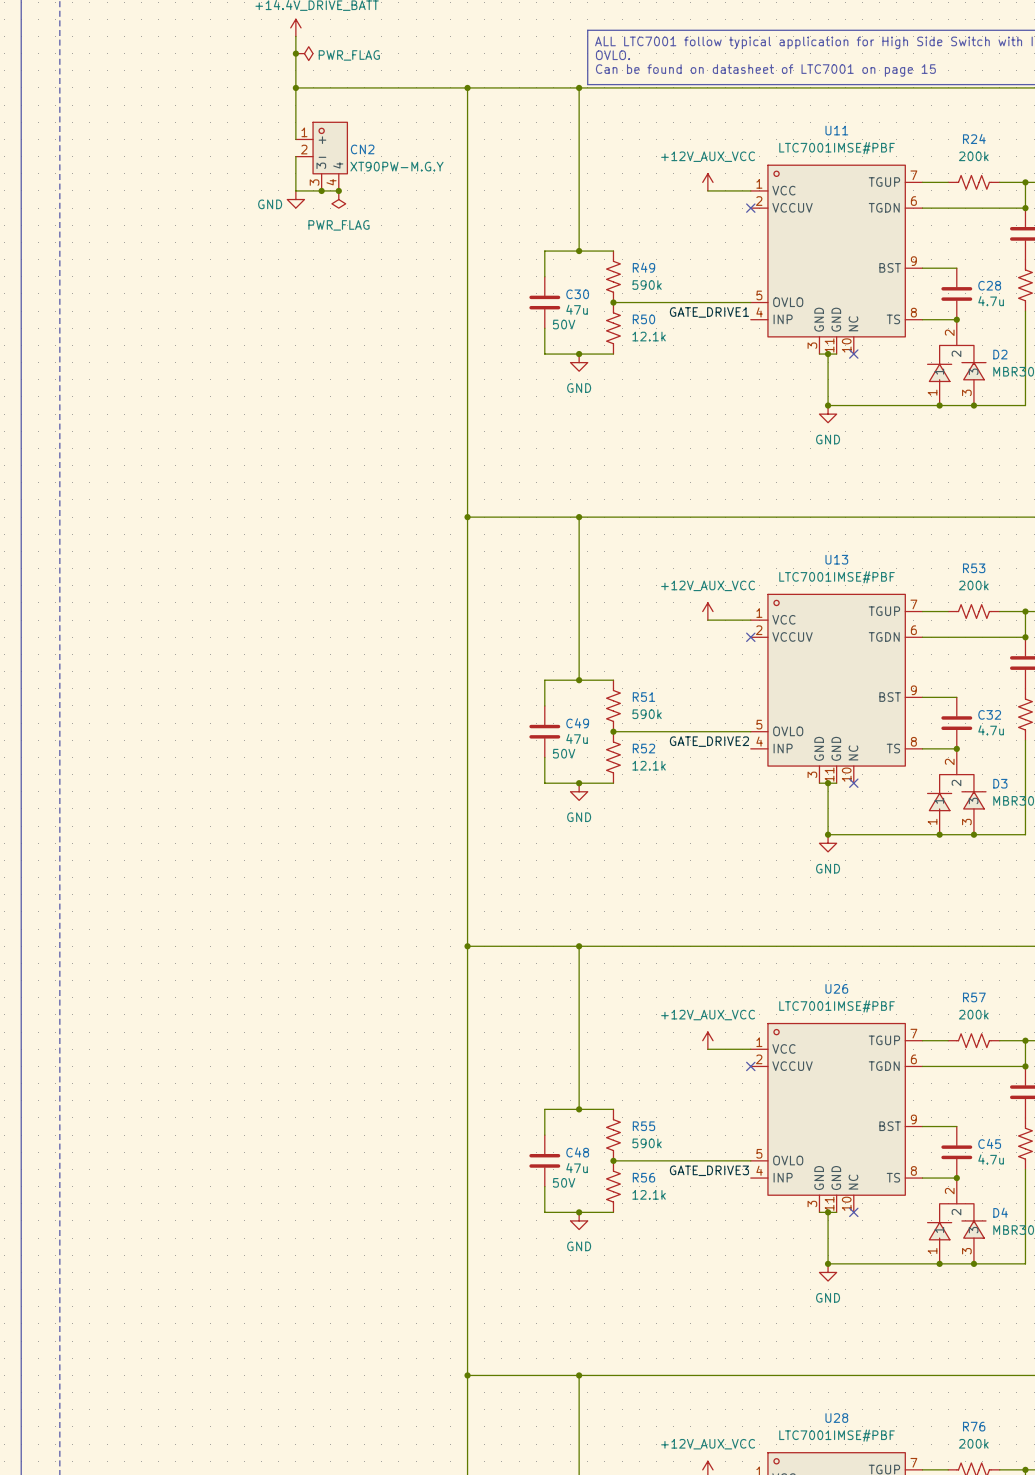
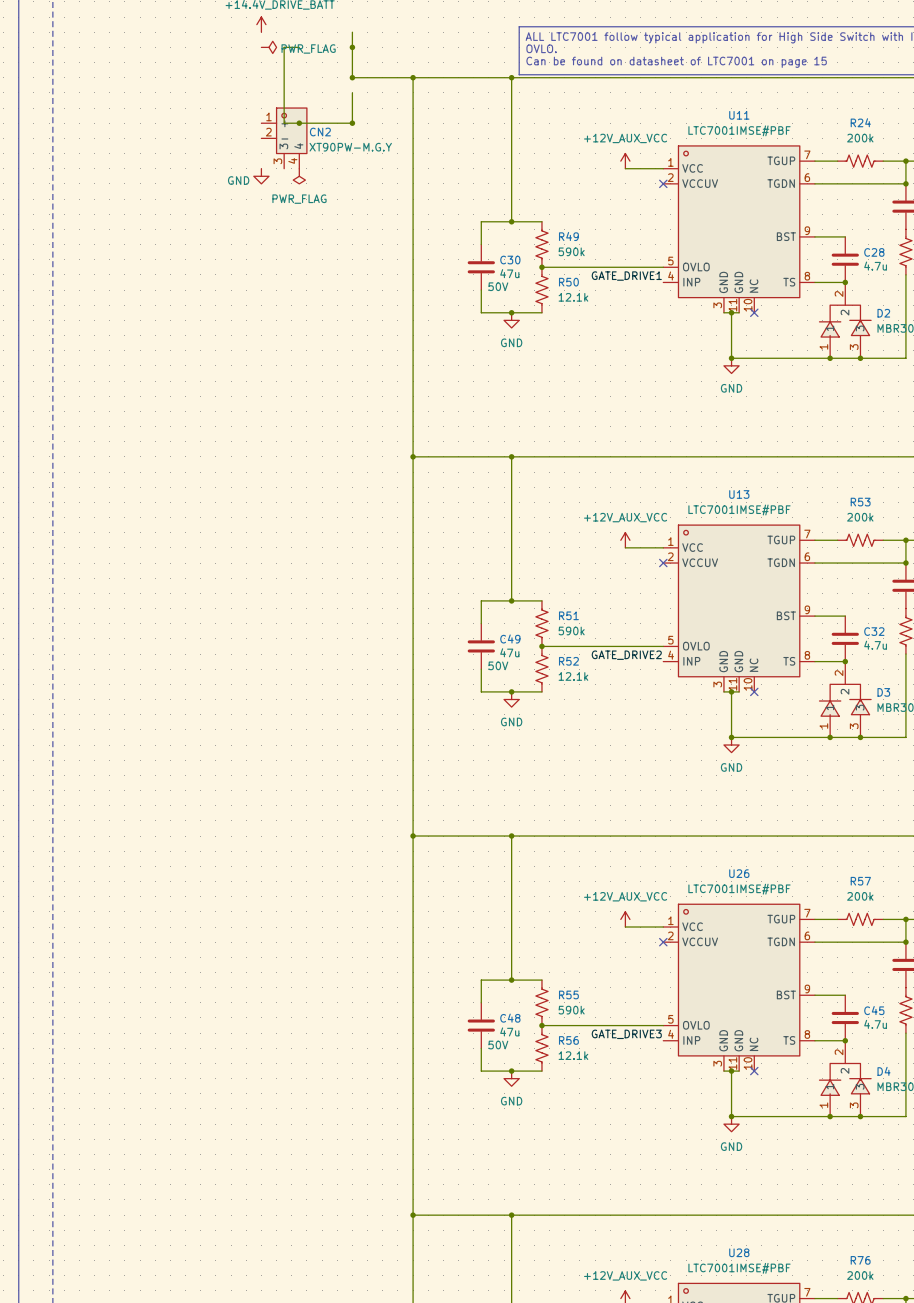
wire: (295, 36) (295, 139) -> none
junction: (295, 53) -> none
wire: none -> (299, 47) (284, 47) (284, 123) (352, 123) (352, 92)
junction: none -> (352, 47)
wire: (295, 87) (398, 87) -> (352, 32) (352, 77)
junction: (295, 87) -> none
junction: none -> (352, 77)
junction: none -> (299, 123)
junction: none -> (352, 123)
wire: (295, 156) (295, 190) (338, 190) -> none
junction: (321, 190) -> none
junction: (338, 190) -> none

